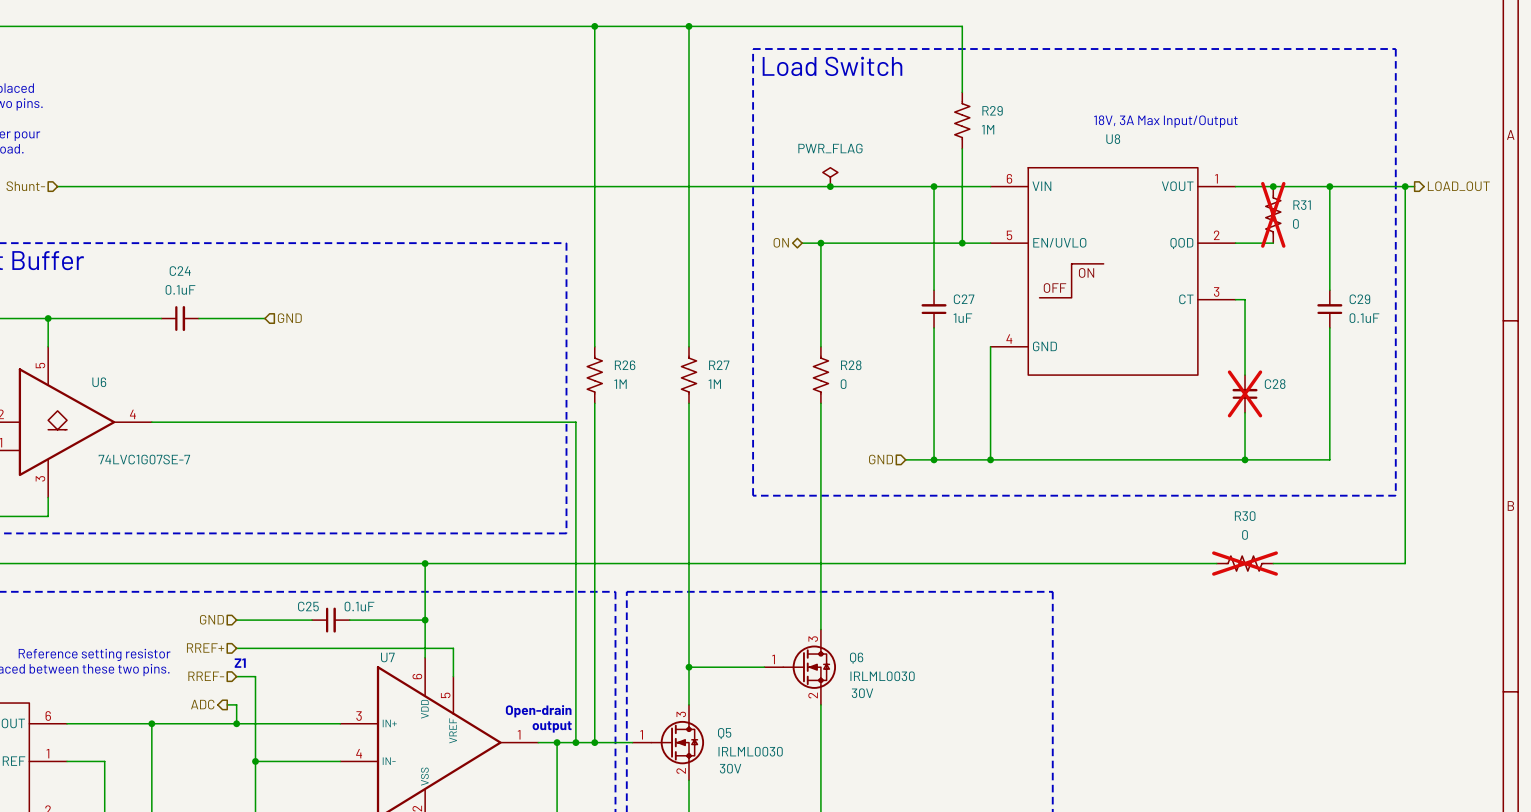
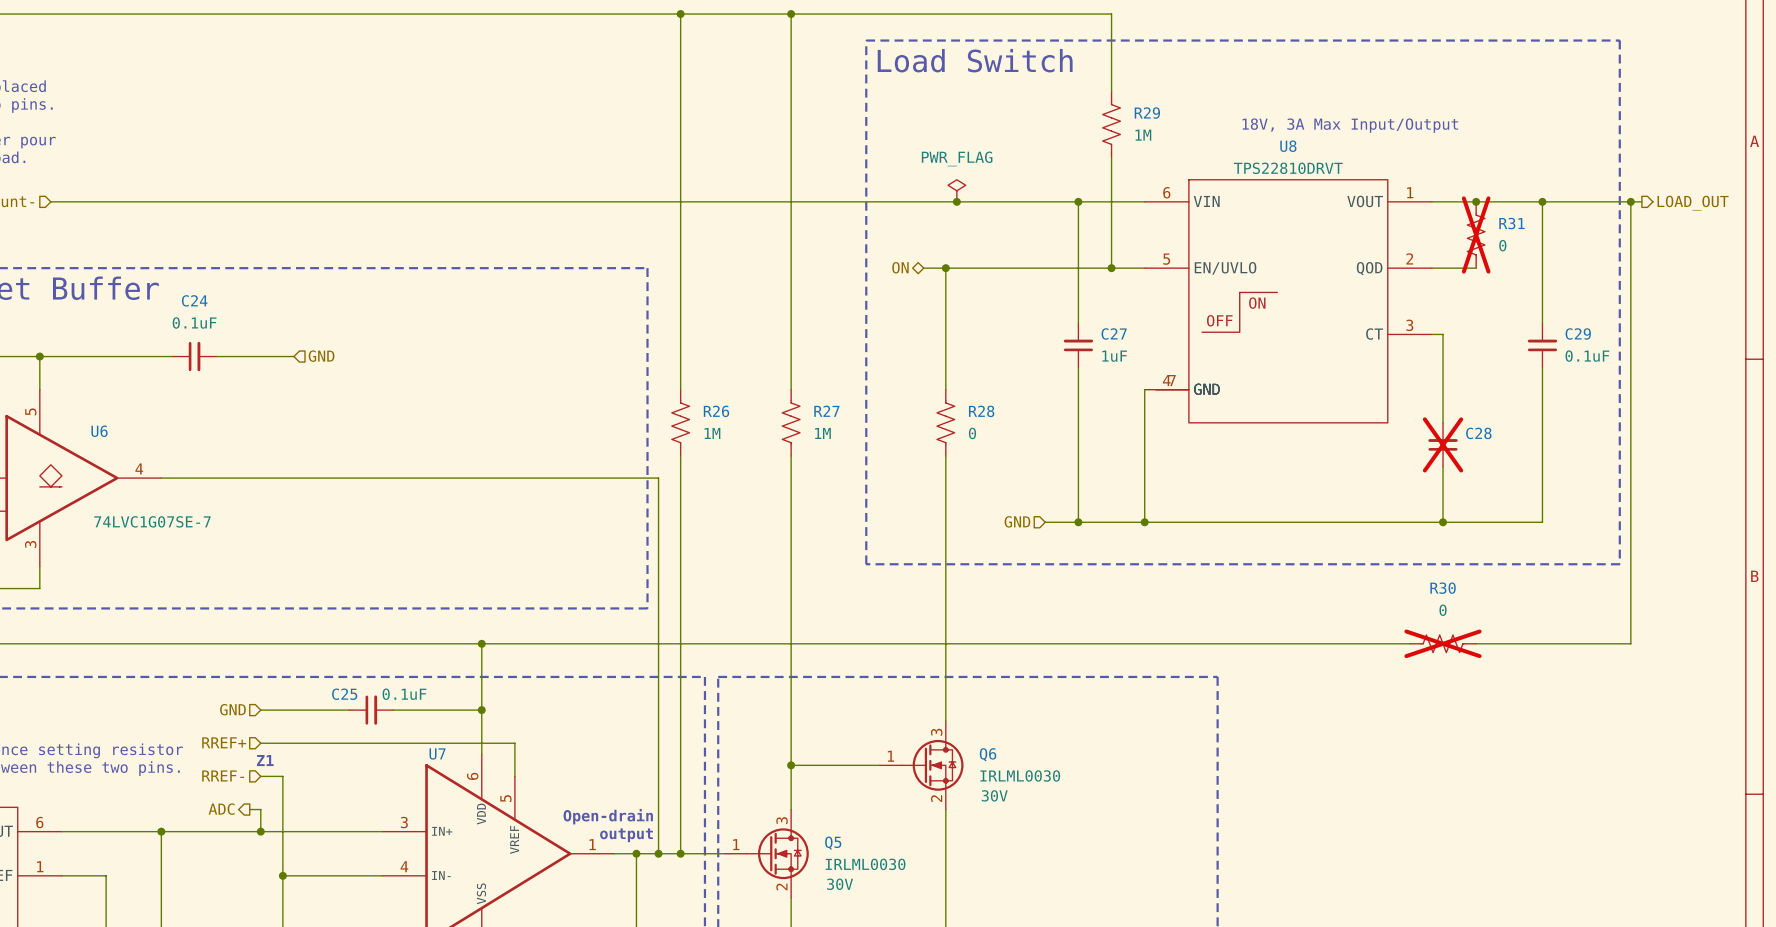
U8 value: none -> TPS22810DRVT (1288, 168)
U8 symbol: [990, 167, 1236, 376] -> [1144, 179, 1432, 423]

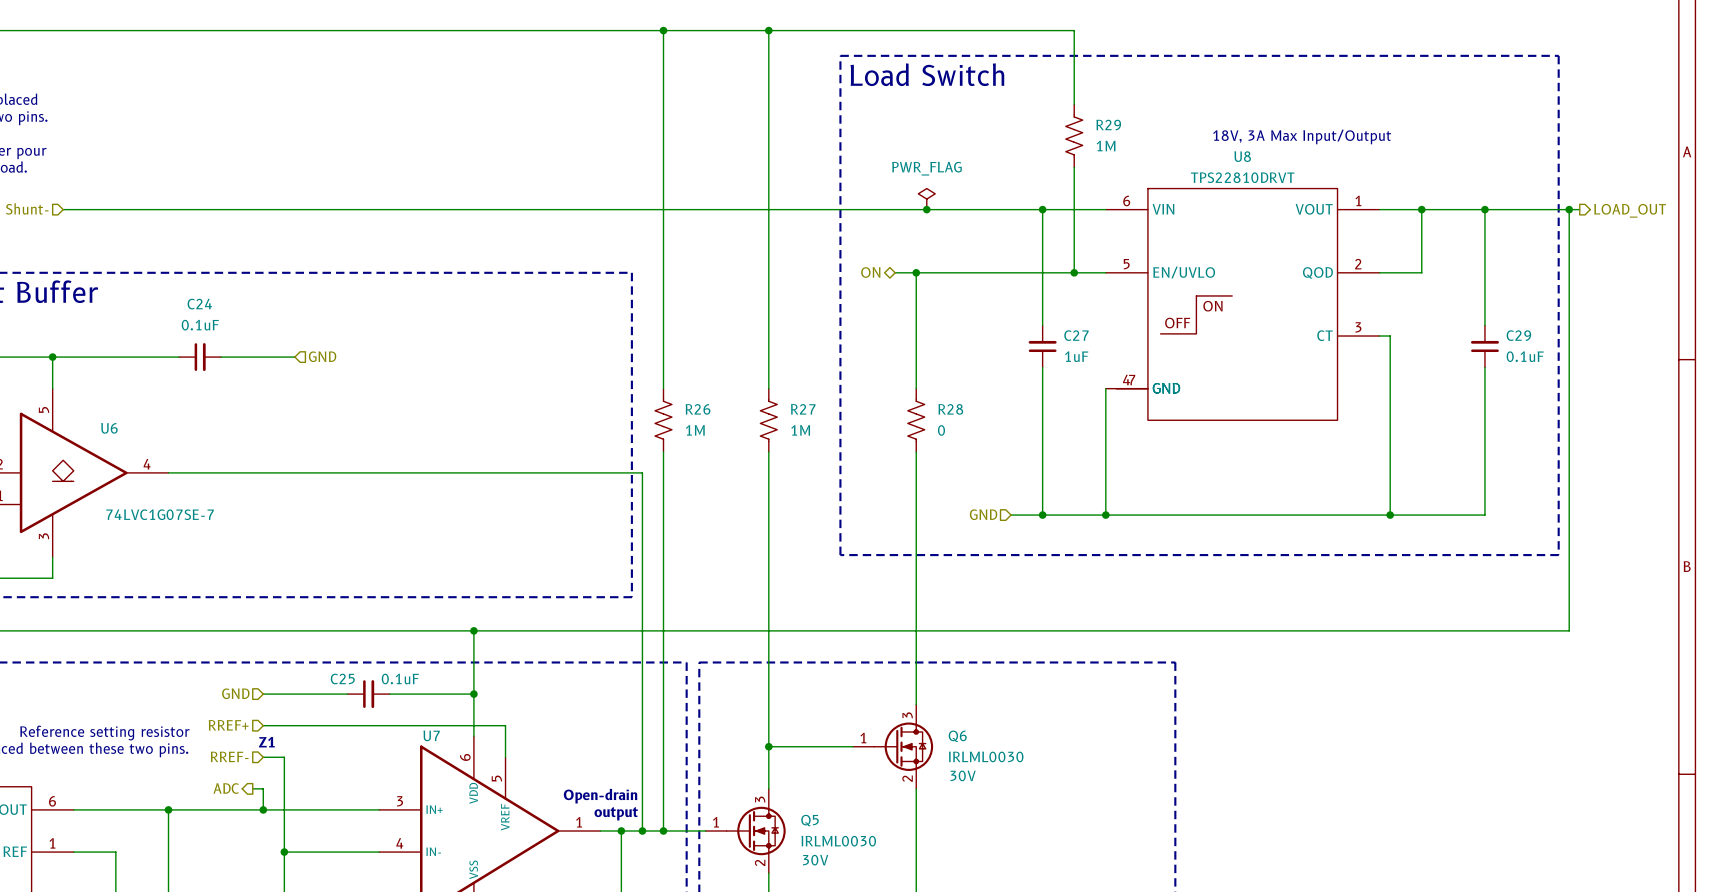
R31: 0 (1476, 235) -> none
C28: (1443, 444) -> none
R30: 0 (1443, 643) -> none

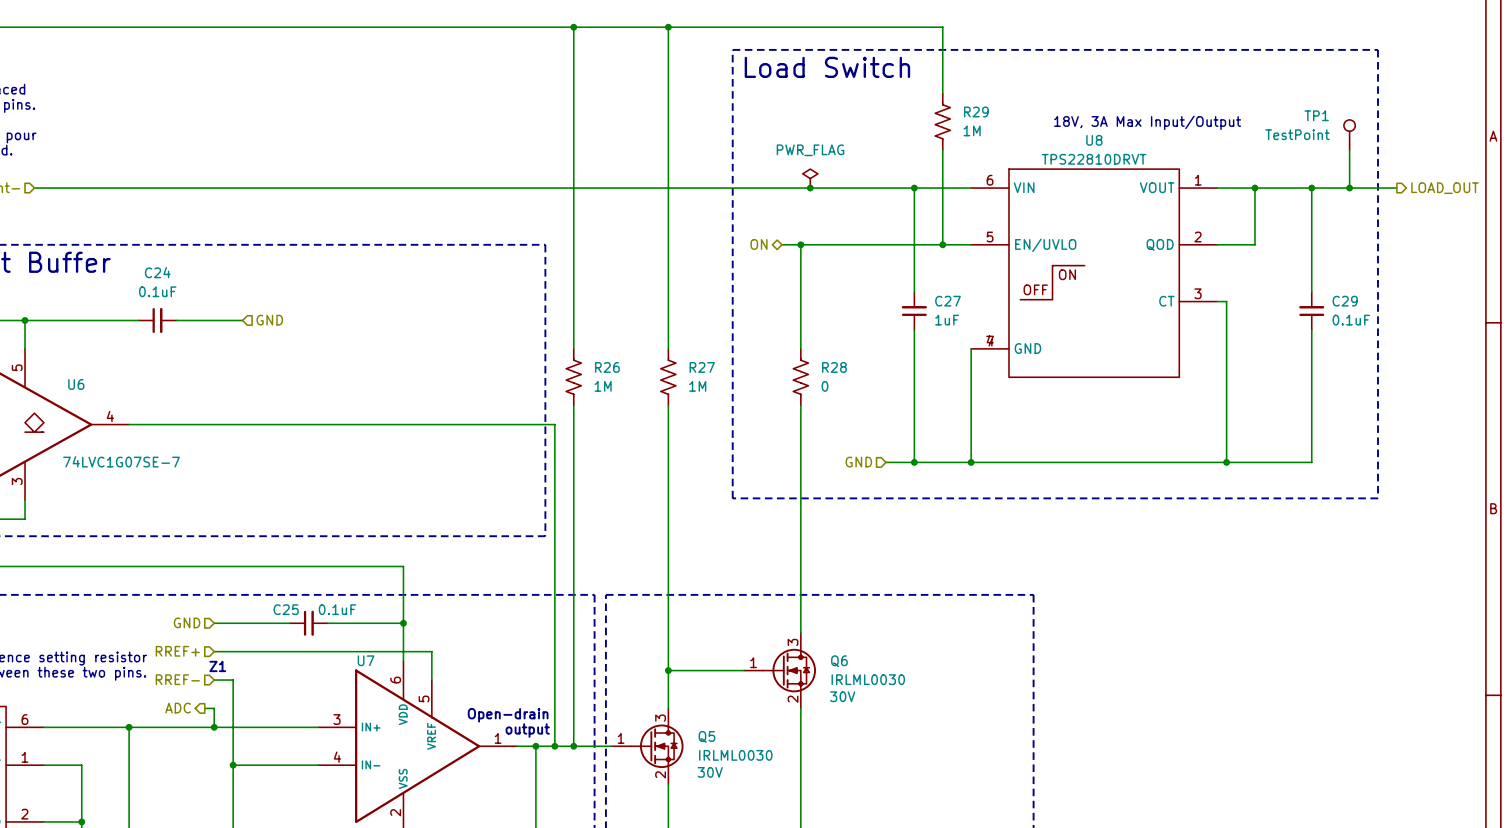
TP1: none -> TestPoint (1349, 135)
wire: none -> (1349, 150) (1349, 188)
U8 symbol: [1105, 188, 1380, 421] -> [971, 169, 1218, 378]
wire: (1569, 209) (1569, 630) (473, 630) -> none
junction position: (1569, 209) -> (1349, 188)
junction: (473, 630) -> none

